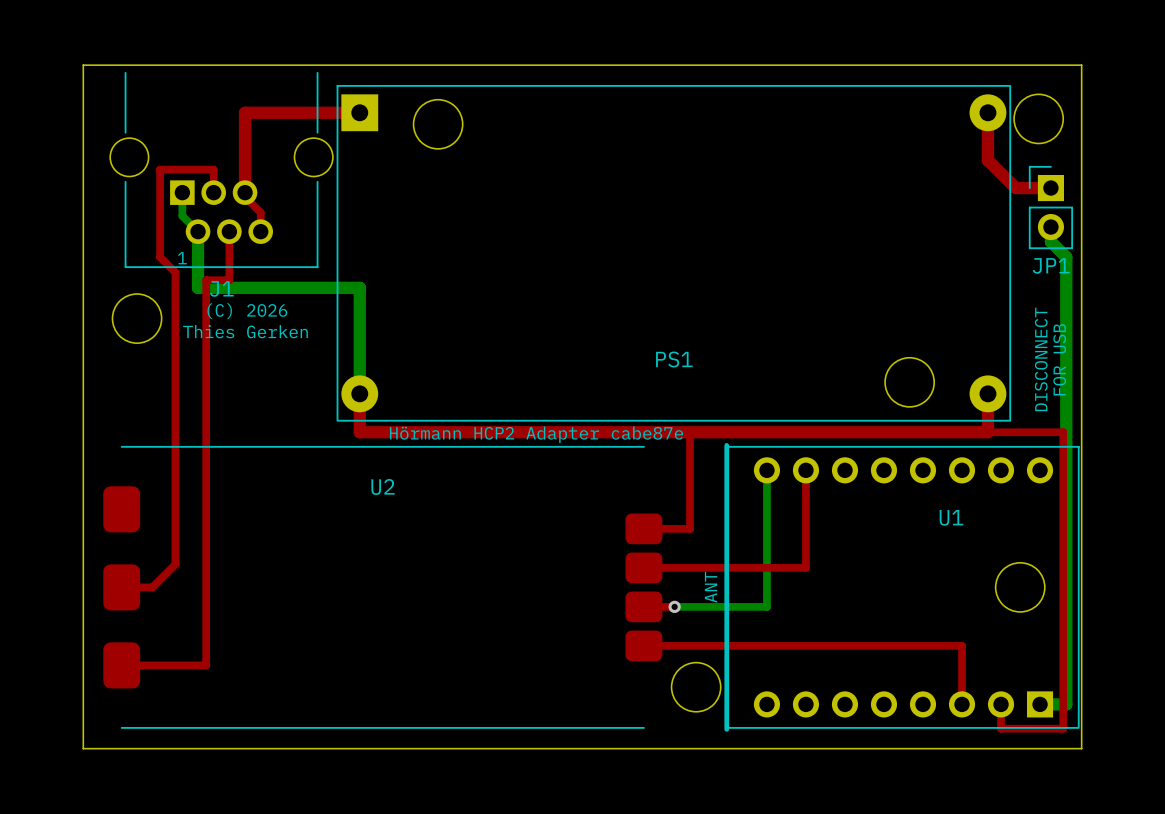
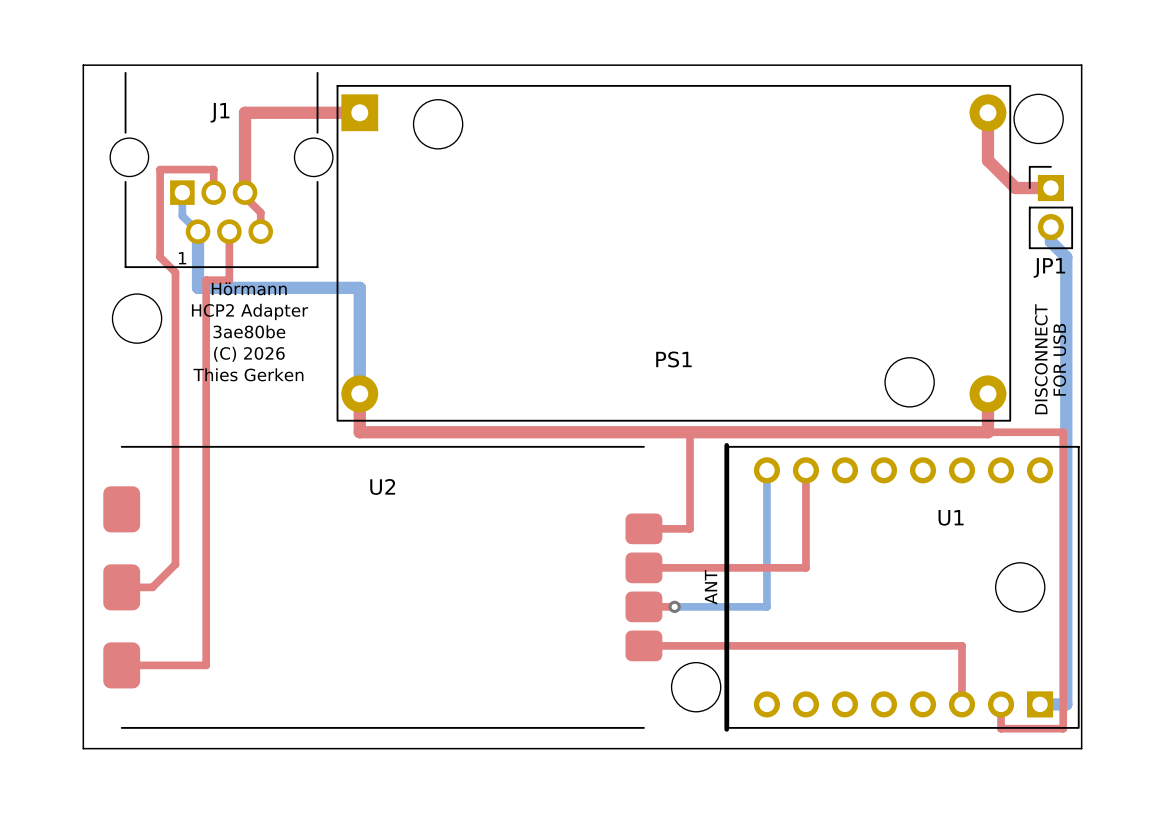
J1 name position: J1 (221, 288) -> J1 (220, 112)
text: none -> Hörmann (249, 288)
text: (C) 2026 (247, 311) -> HCP2 Adapter (250, 311)
text: Thies Gerken (245, 331) -> 3ae80be (249, 331)
text: none -> (C) 2026 (249, 354)
text: none -> Thies Gerken (248, 374)
text: Hörmann HCP2 Adapter cabe87e (536, 434) -> none

